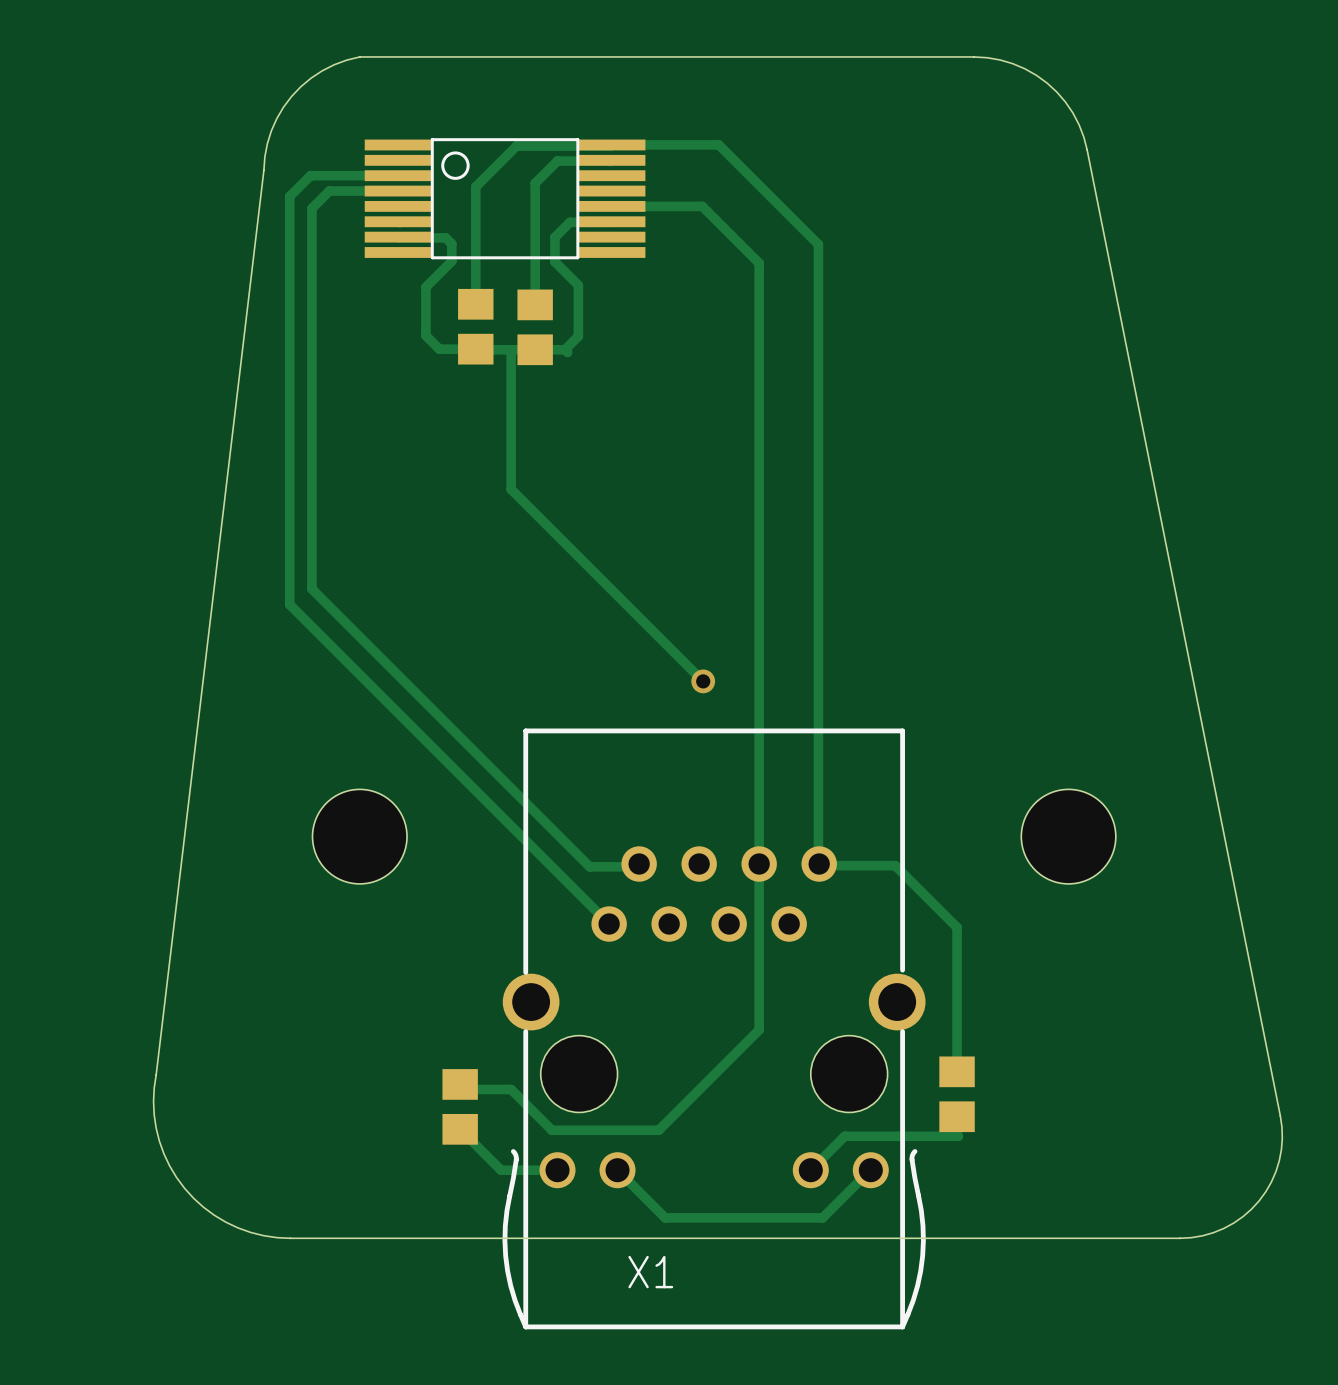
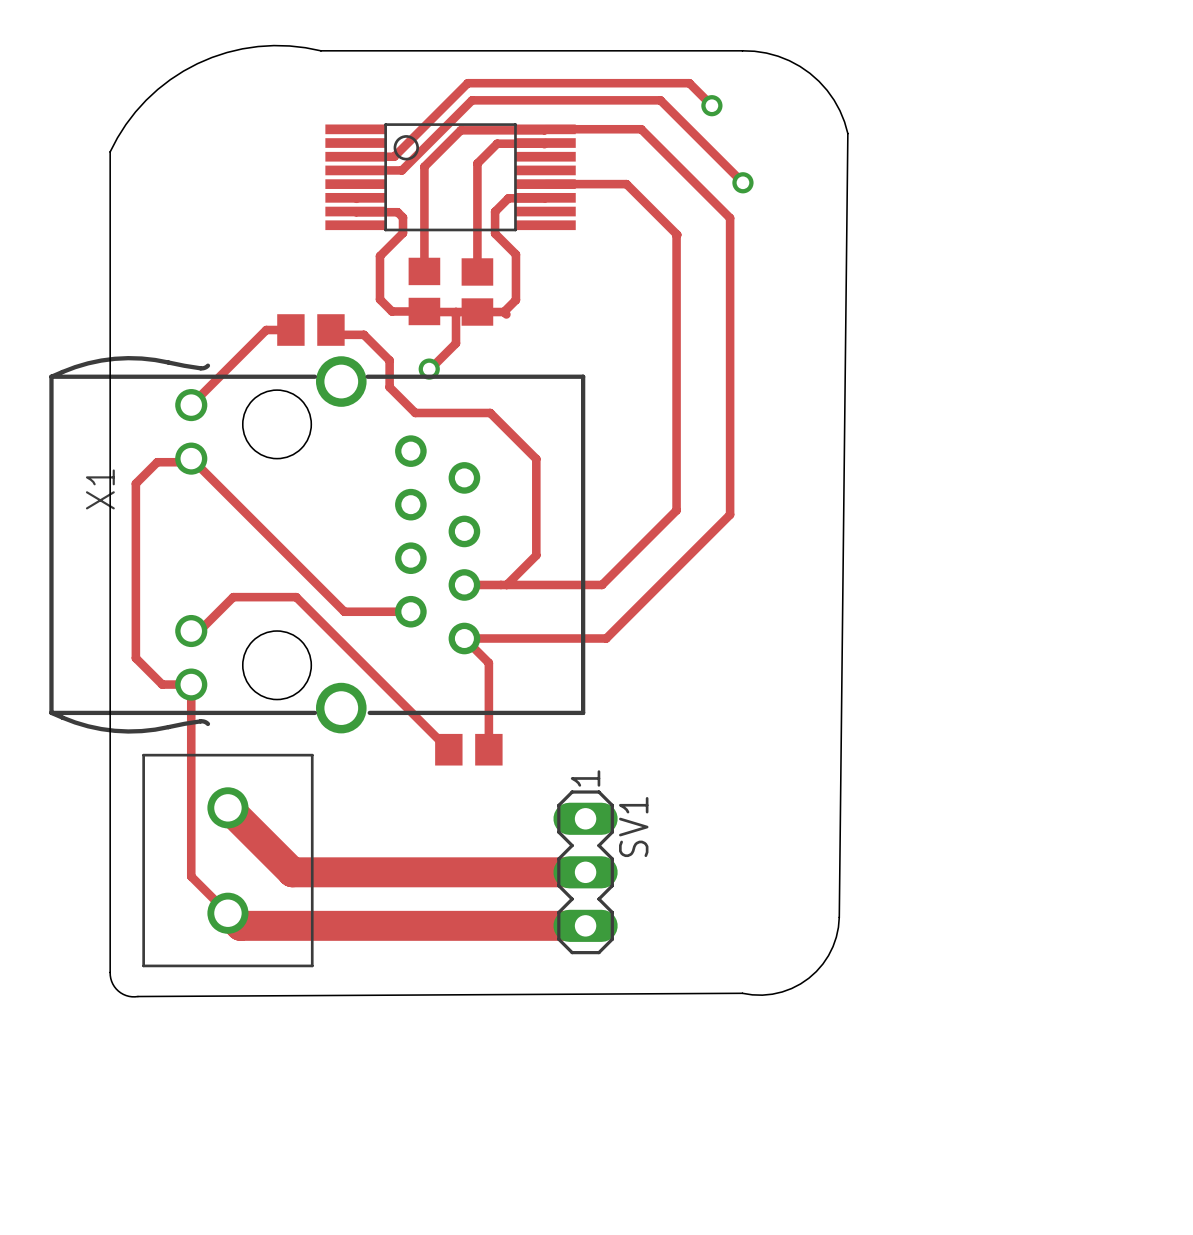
board edge: (359, 56) (346, 60) (322, 70) (311, 78) (291, 96) (283, 107) (271, 130) (264, 156) (154, 1088) (154, 1114) (159, 1141) (176, 1177) (203, 1207) (225, 1222) (250, 1232) (276, 1237) (1180, 1238) (1213, 1232) (1243, 1216) (1265, 1191) (1279, 1160) (1281, 1127) (1083, 136) (1072, 112) (1056, 92) (1036, 75) (1012, 63) (987, 57) (973, 56) (832, 56) -> (320, 50) (289, 45) (258, 46) (227, 52) (197, 63) (170, 79) (146, 100) (125, 124) (110, 151) (110, 972) (111, 981) (116, 988) (129, 996) (742, 993) (762, 995) (782, 991) (800, 983) (816, 971) (828, 955) (836, 937) (839, 917) (847, 133) (834, 100) (809, 73) (778, 56) (742, 50)
via: none -> (711, 105)
track: (398, 175) (310, 175) (289, 196) (289, 604) (609, 924) -> (355, 156) (394, 156) (467, 83) (689, 83) (711, 105)
track: (398, 191) (329, 191) (311, 208) (311, 588) (589, 866) (636, 866) (639, 864) -> (355, 170) (401, 170) (472, 100) (660, 100) (742, 182)
via: none -> (742, 182)
track: (759, 263) (759, 1029) (658, 1130) (551, 1130) (511, 1089) (465, 1089) (460, 1084) -> (677, 234) (676, 510) (602, 584) (464, 584)
track: none -> (290, 330) (266, 330) (191, 405)
part: none -> (310, 330)
track: none -> (330, 330) (335, 334) (363, 334) (389, 360) (389, 387) (415, 412) (490, 412) (536, 459) (536, 555) (506, 584)
track: (511, 384) (511, 489) (703, 681) -> (456, 343) (429, 369)
via: none -> (429, 369)
track: (818, 576) (818, 863) (820, 865) (895, 865) (957, 927) (957, 1071) -> (730, 514) (606, 638) (464, 638) (488, 662) (488, 749)
via: (703, 681) -> none
track: none -> (410, 611) (344, 611) (191, 458) (187, 462) (157, 462) (135, 483) (135, 658) (162, 684) (191, 684) (191, 876) (240, 925)
track: none -> (191, 631) (199, 631) (233, 597) (296, 597) (448, 749)
hole: (359, 836) -> none
hole: (1068, 836) -> none
part: none -> (468, 749)
track: none -> (227, 807) (292, 872) (585, 872)
part: none -> (227, 860)
SV1: none -> (585, 872)
X1 rotation: 0° (714, 1028) -> 90° clockwise (317, 544)
X1 position: (714, 1028) -> (317, 544)
track: none -> (240, 925) (585, 925)
part: (957, 1094) -> none
part: (460, 1106) -> none
track: (957, 1116) (958, 1136) (844, 1136) (810, 1170) -> none
track: (460, 1129) (501, 1170) (557, 1170) -> none
track: (617, 1170) (665, 1217) (822, 1217) (870, 1170) -> none

